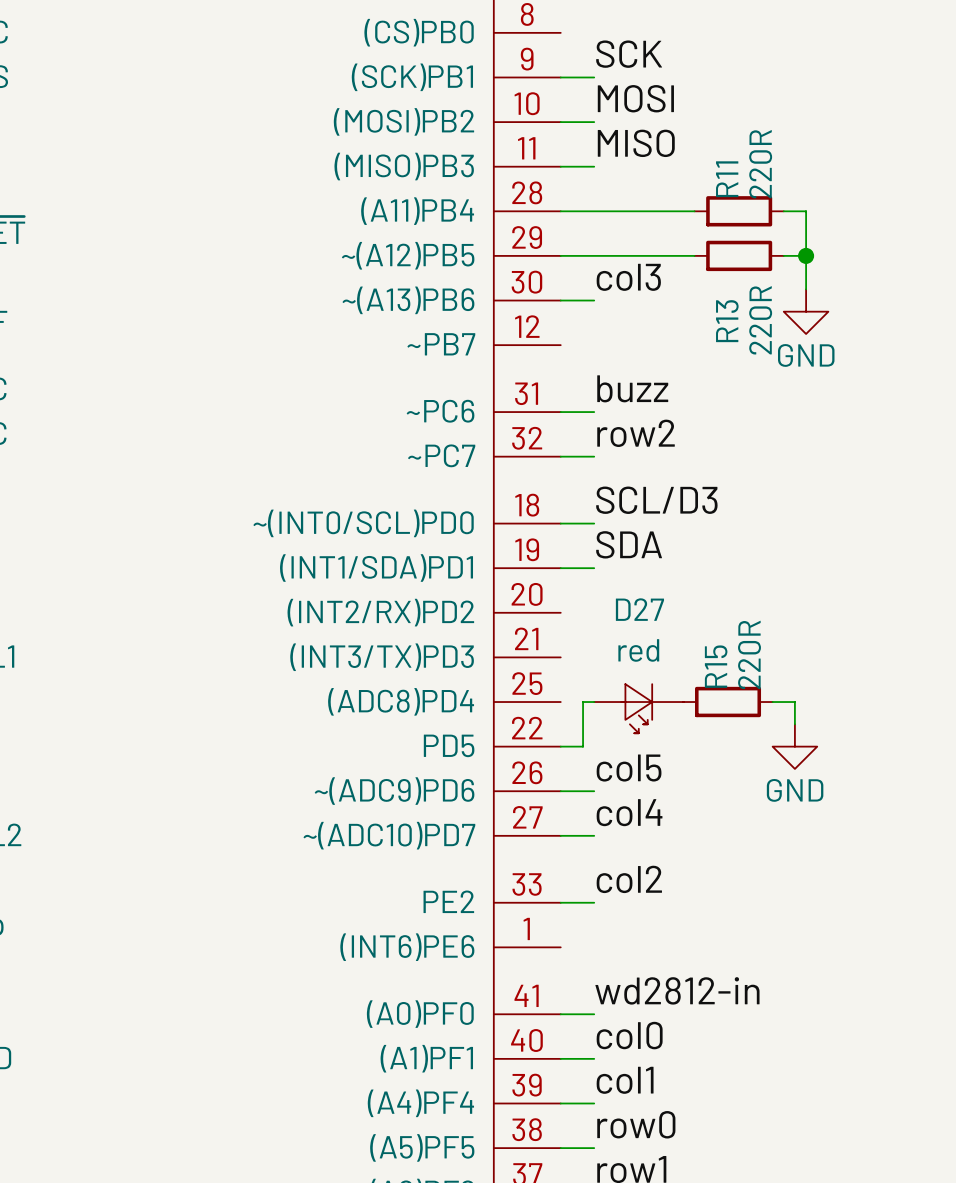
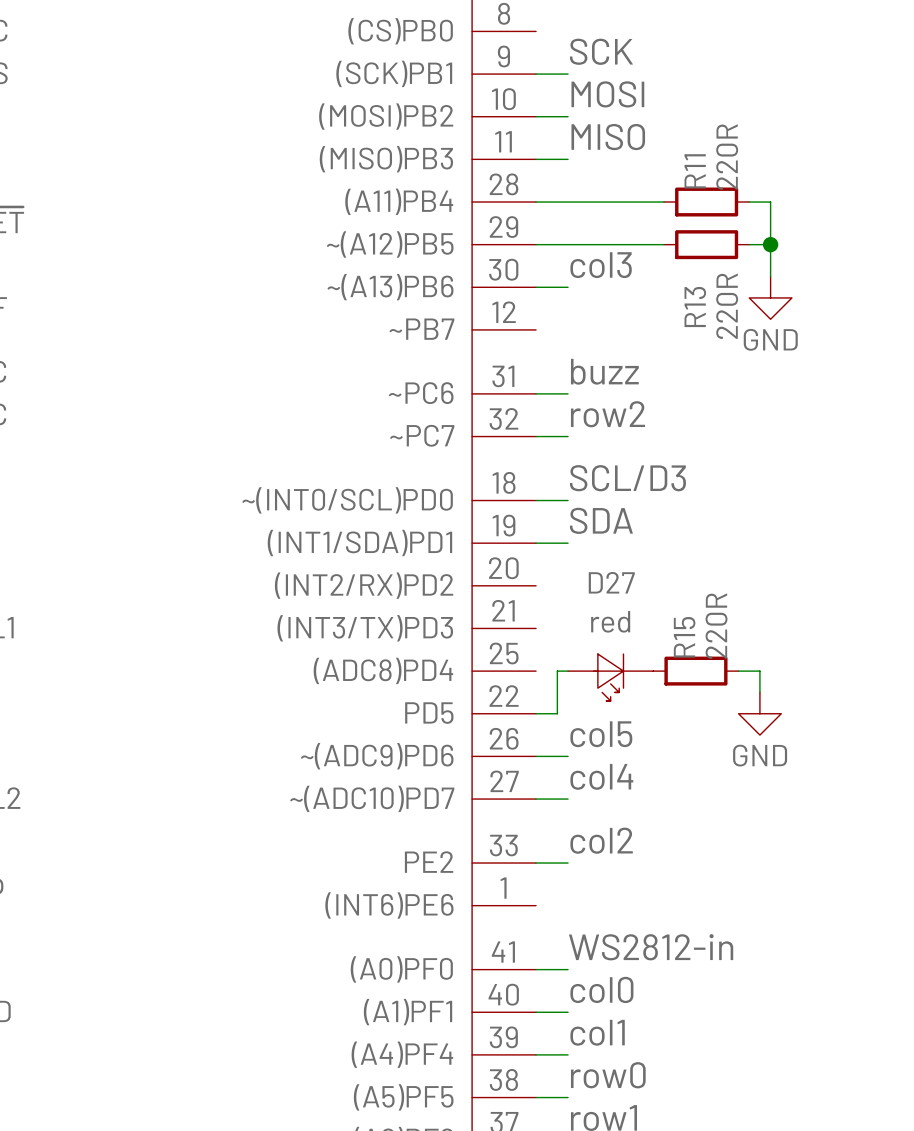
label: wd2812-in (677, 990) -> WS2812-in (651, 947)

